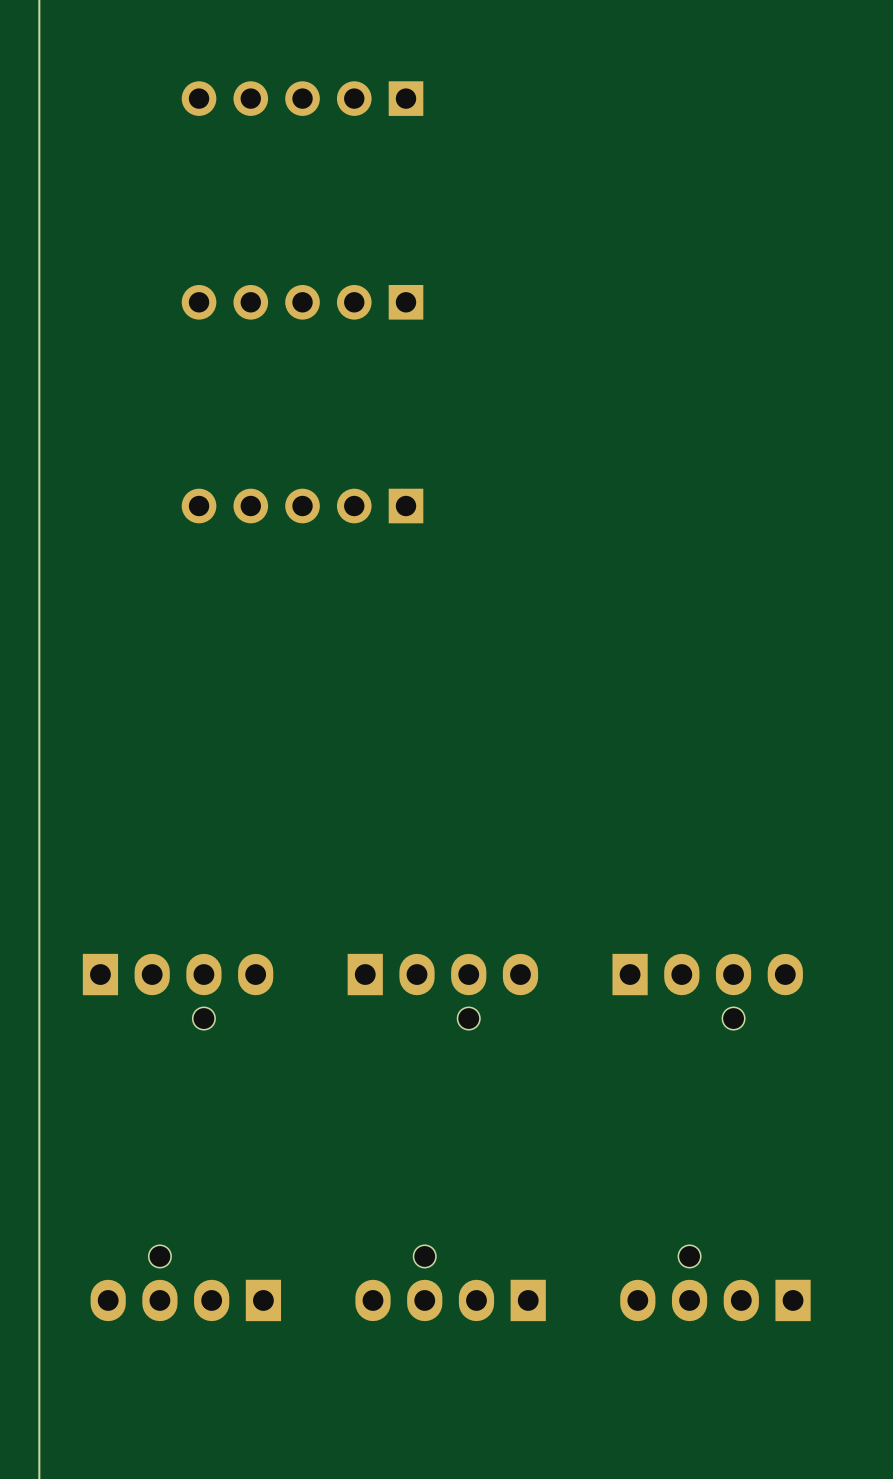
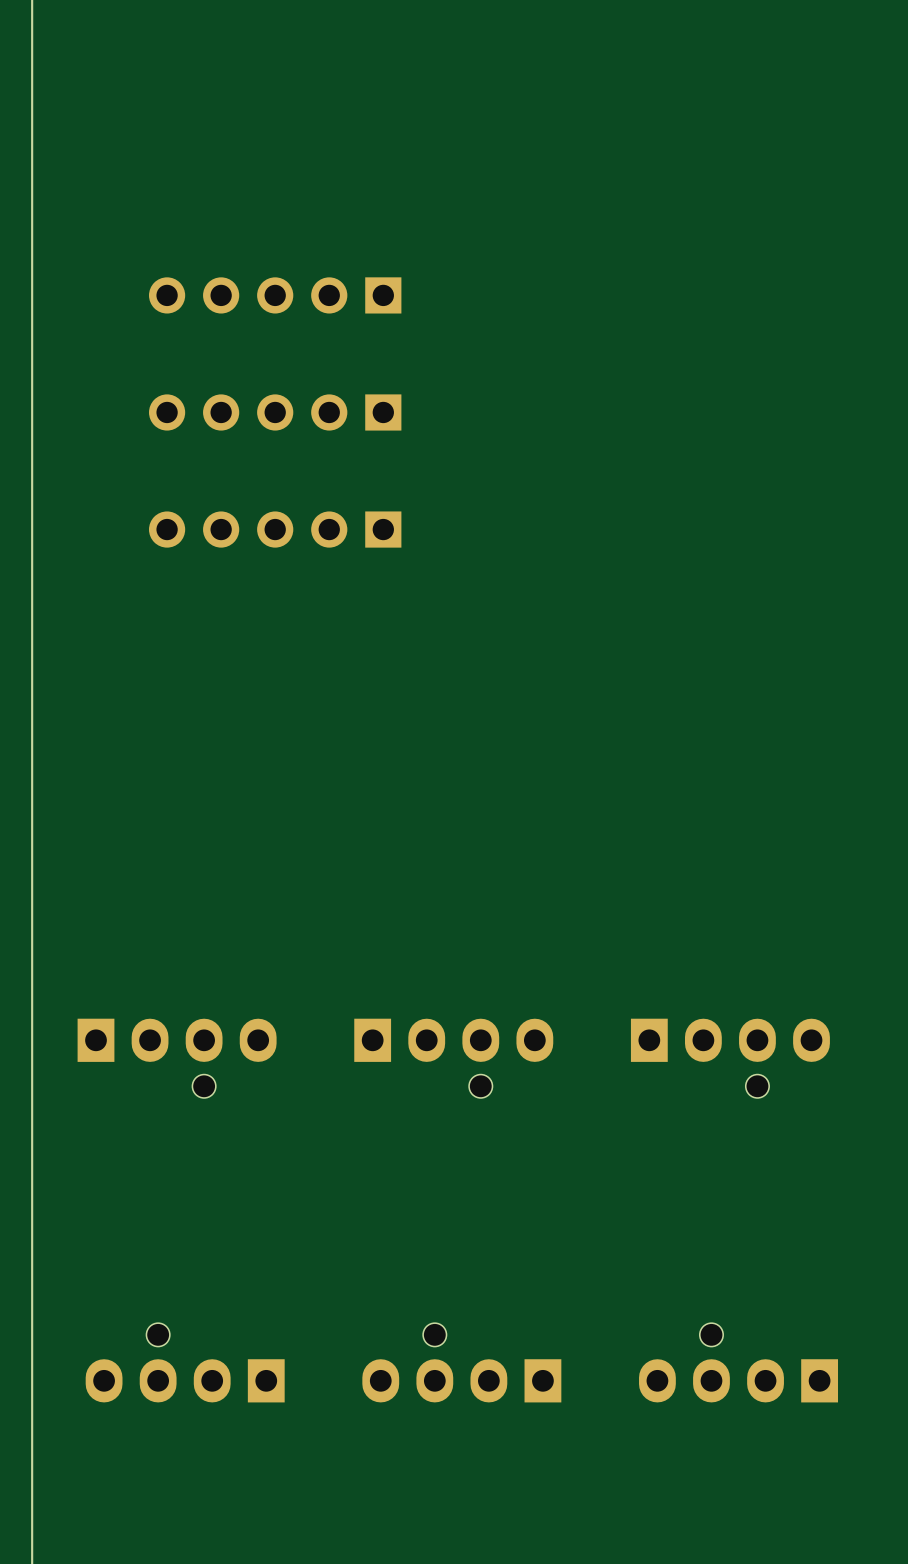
part: (302, 98) -> none
part: none -> (275, 295)
part: (302, 302) -> none
part: none -> (275, 412)
part position: (302, 506) -> (275, 529)

